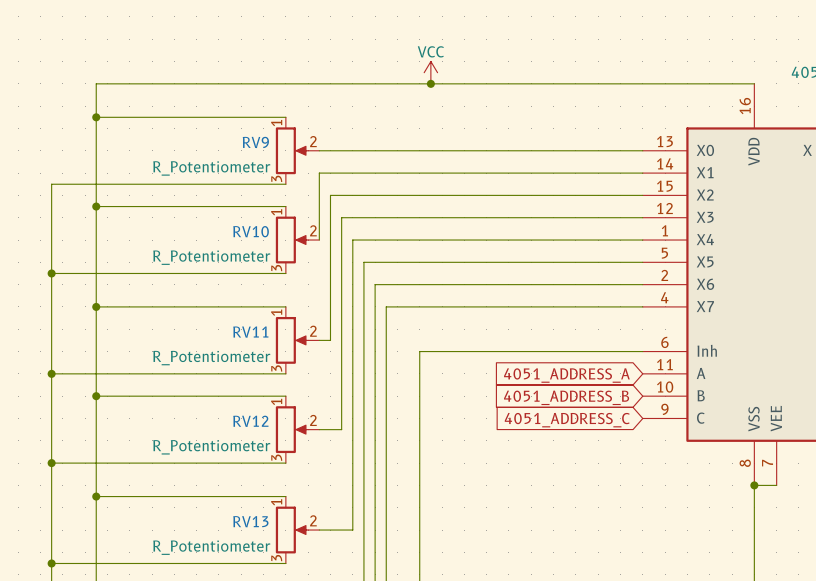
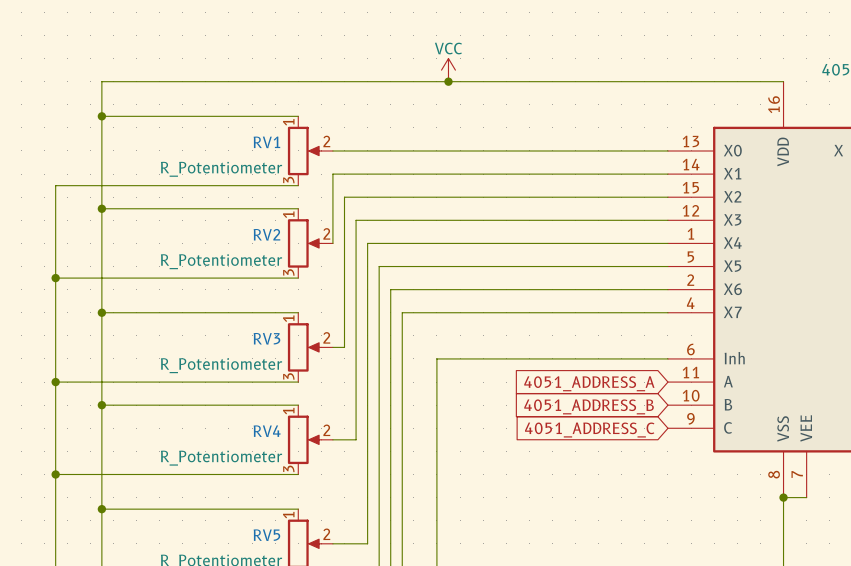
RV9 name: RV9 (255, 142) -> RV1 (266, 142)
RV10 name: RV10 (251, 231) -> RV2 (266, 234)
RV11 name: RV11 (250, 332) -> RV3 (266, 338)
RV12 name: RV12 (250, 421) -> RV4 (267, 431)
RV13 name: RV13 (250, 521) -> RV5 (266, 535)

